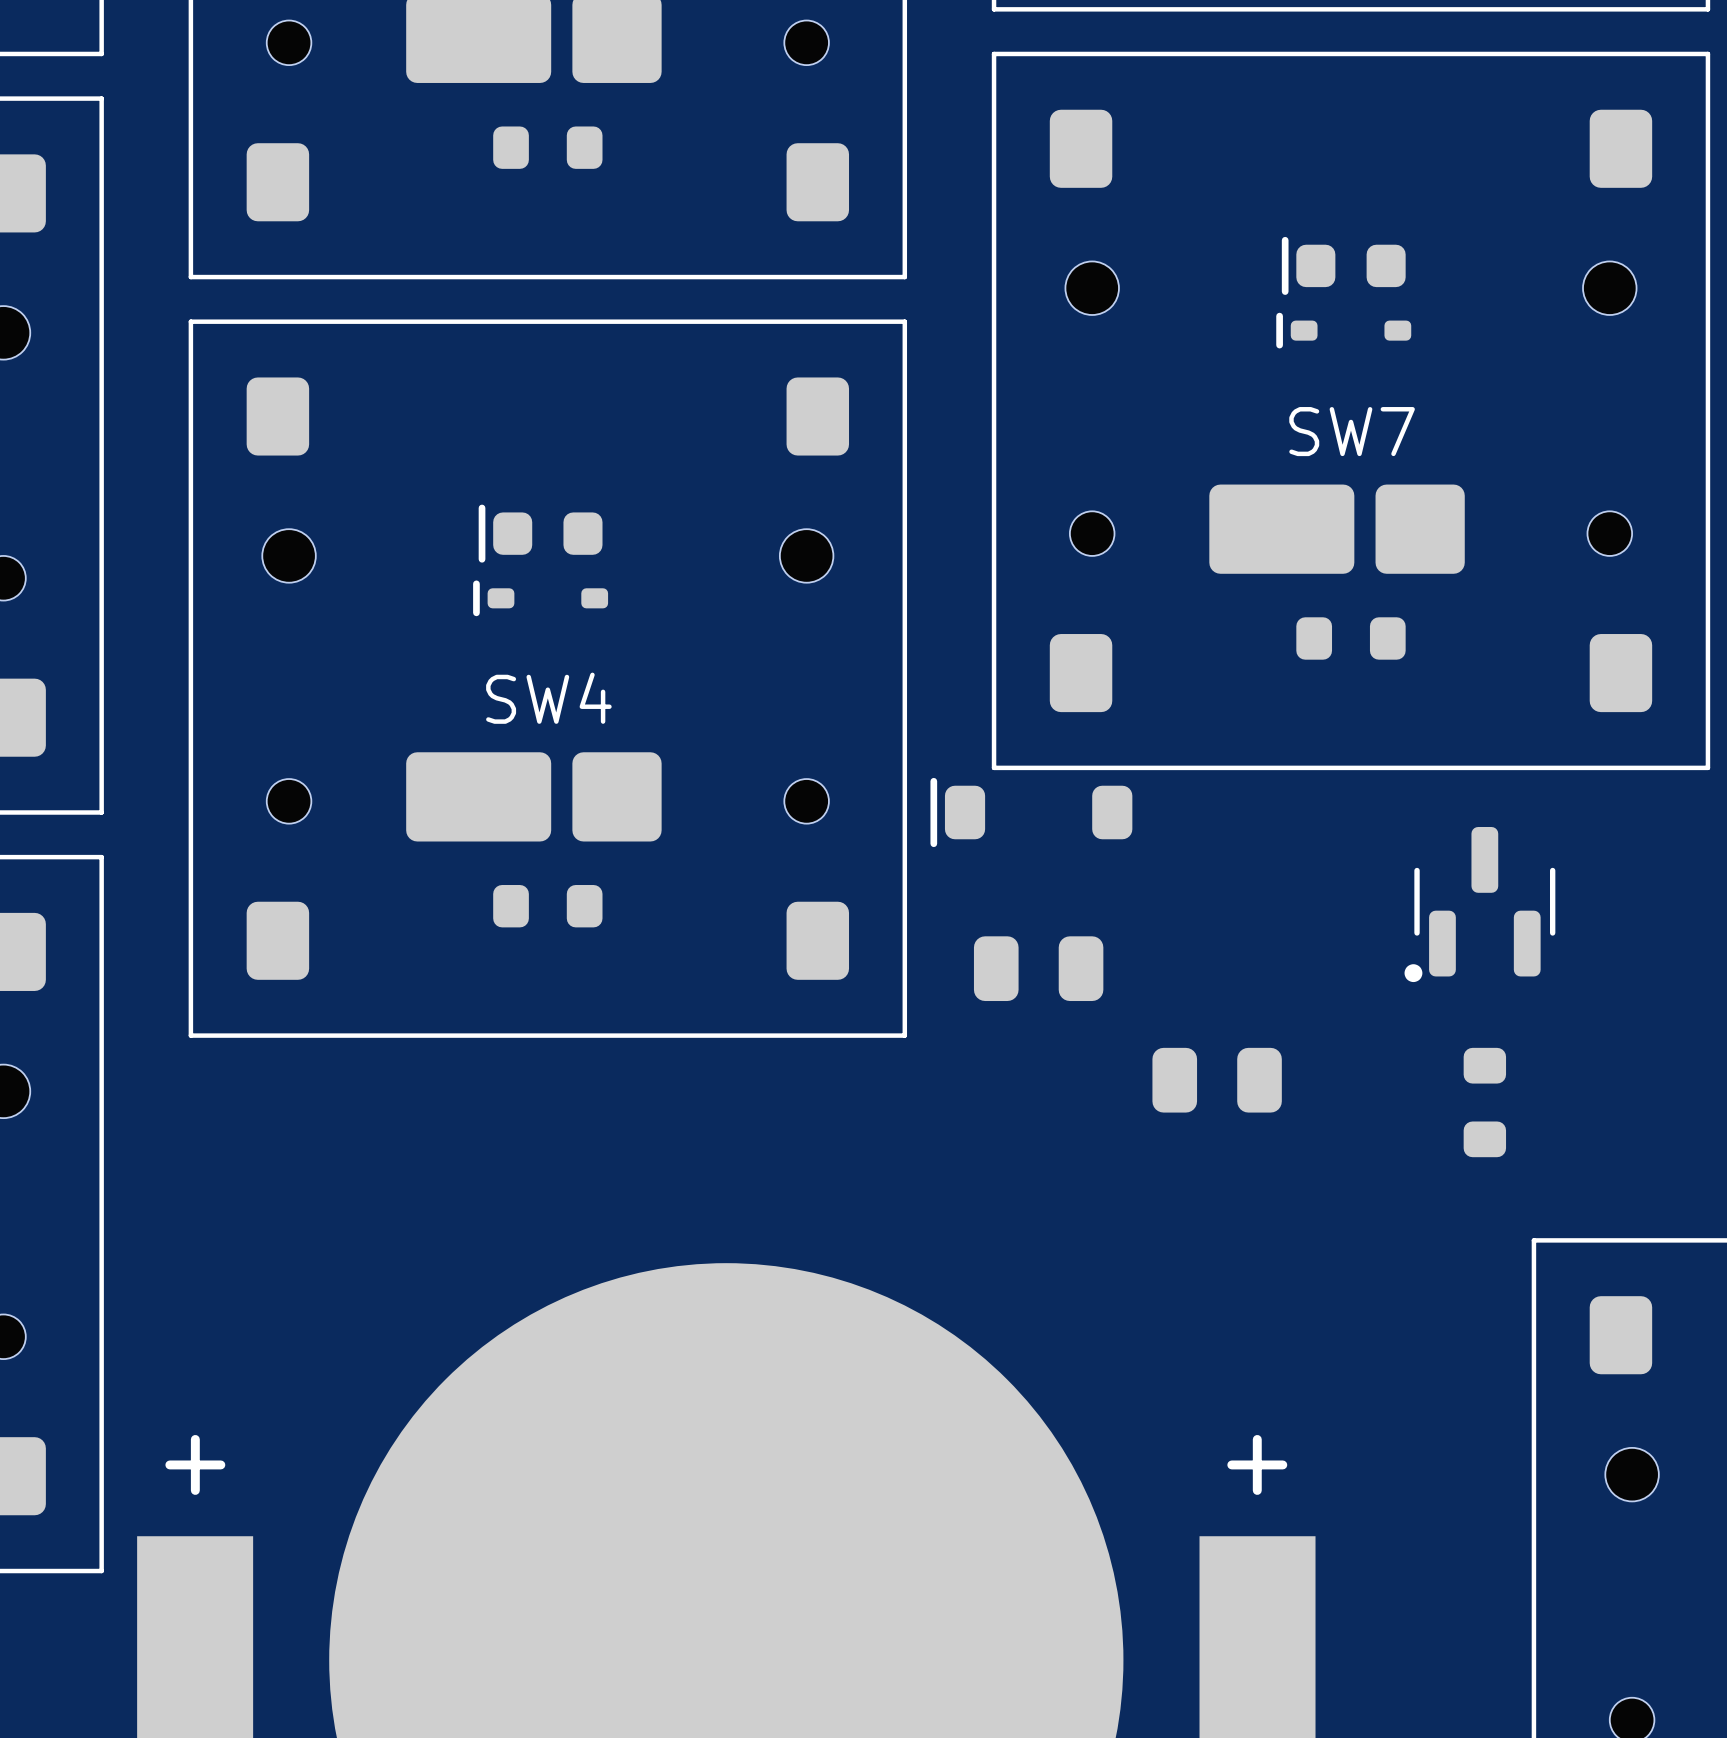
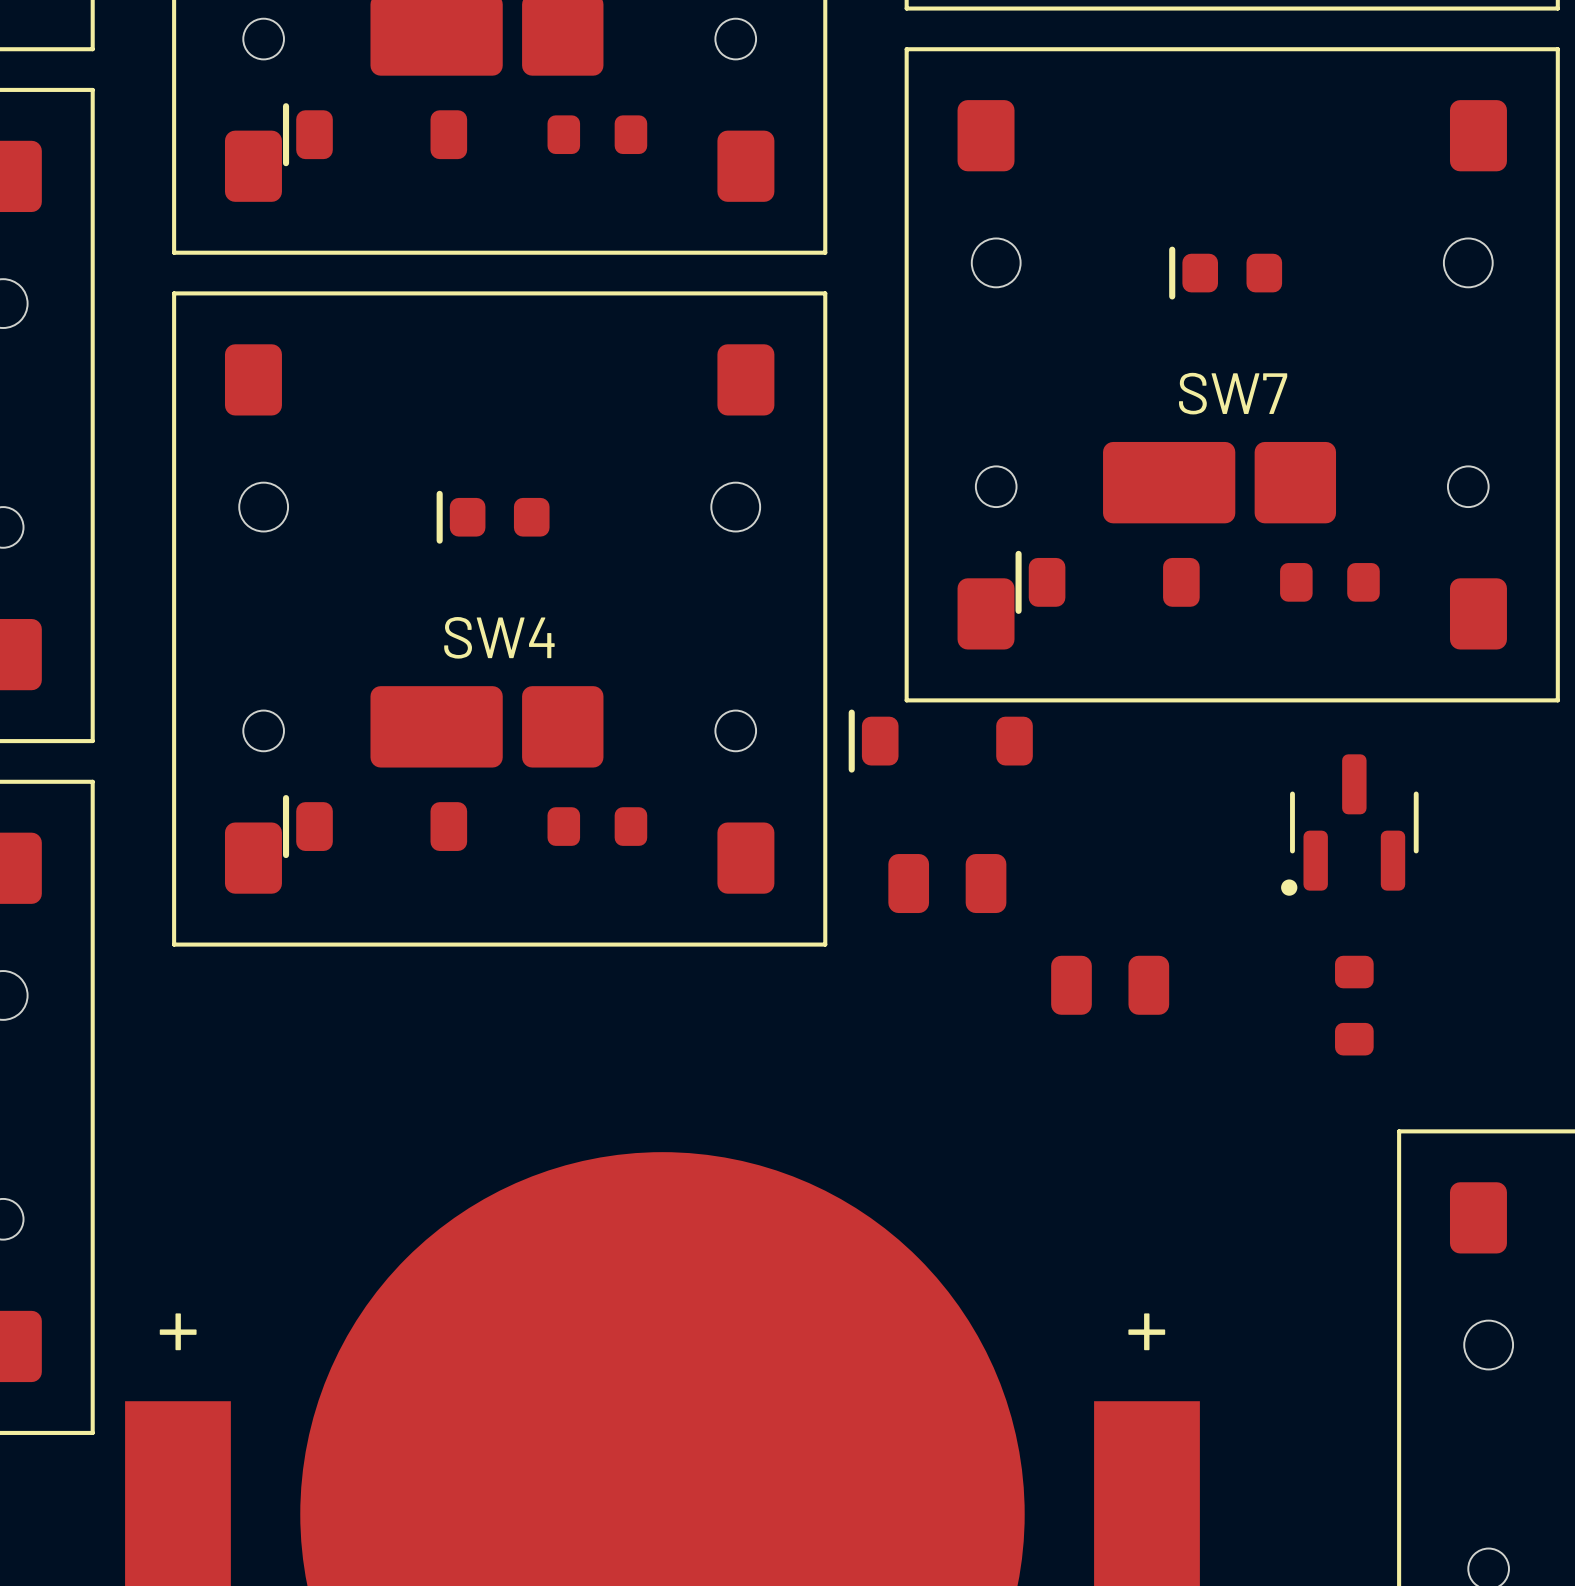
part: none -> (375, 134)
part position: (547, 147) -> (597, 134)
part position: (1343, 265) -> (1225, 273)
part: (1343, 330) -> none
part position: (540, 533) -> (493, 517)
part: (540, 598) -> none
part: none -> (1107, 582)
part position: (1350, 638) -> (1329, 582)
part: none -> (375, 826)
part position: (547, 906) -> (597, 826)

